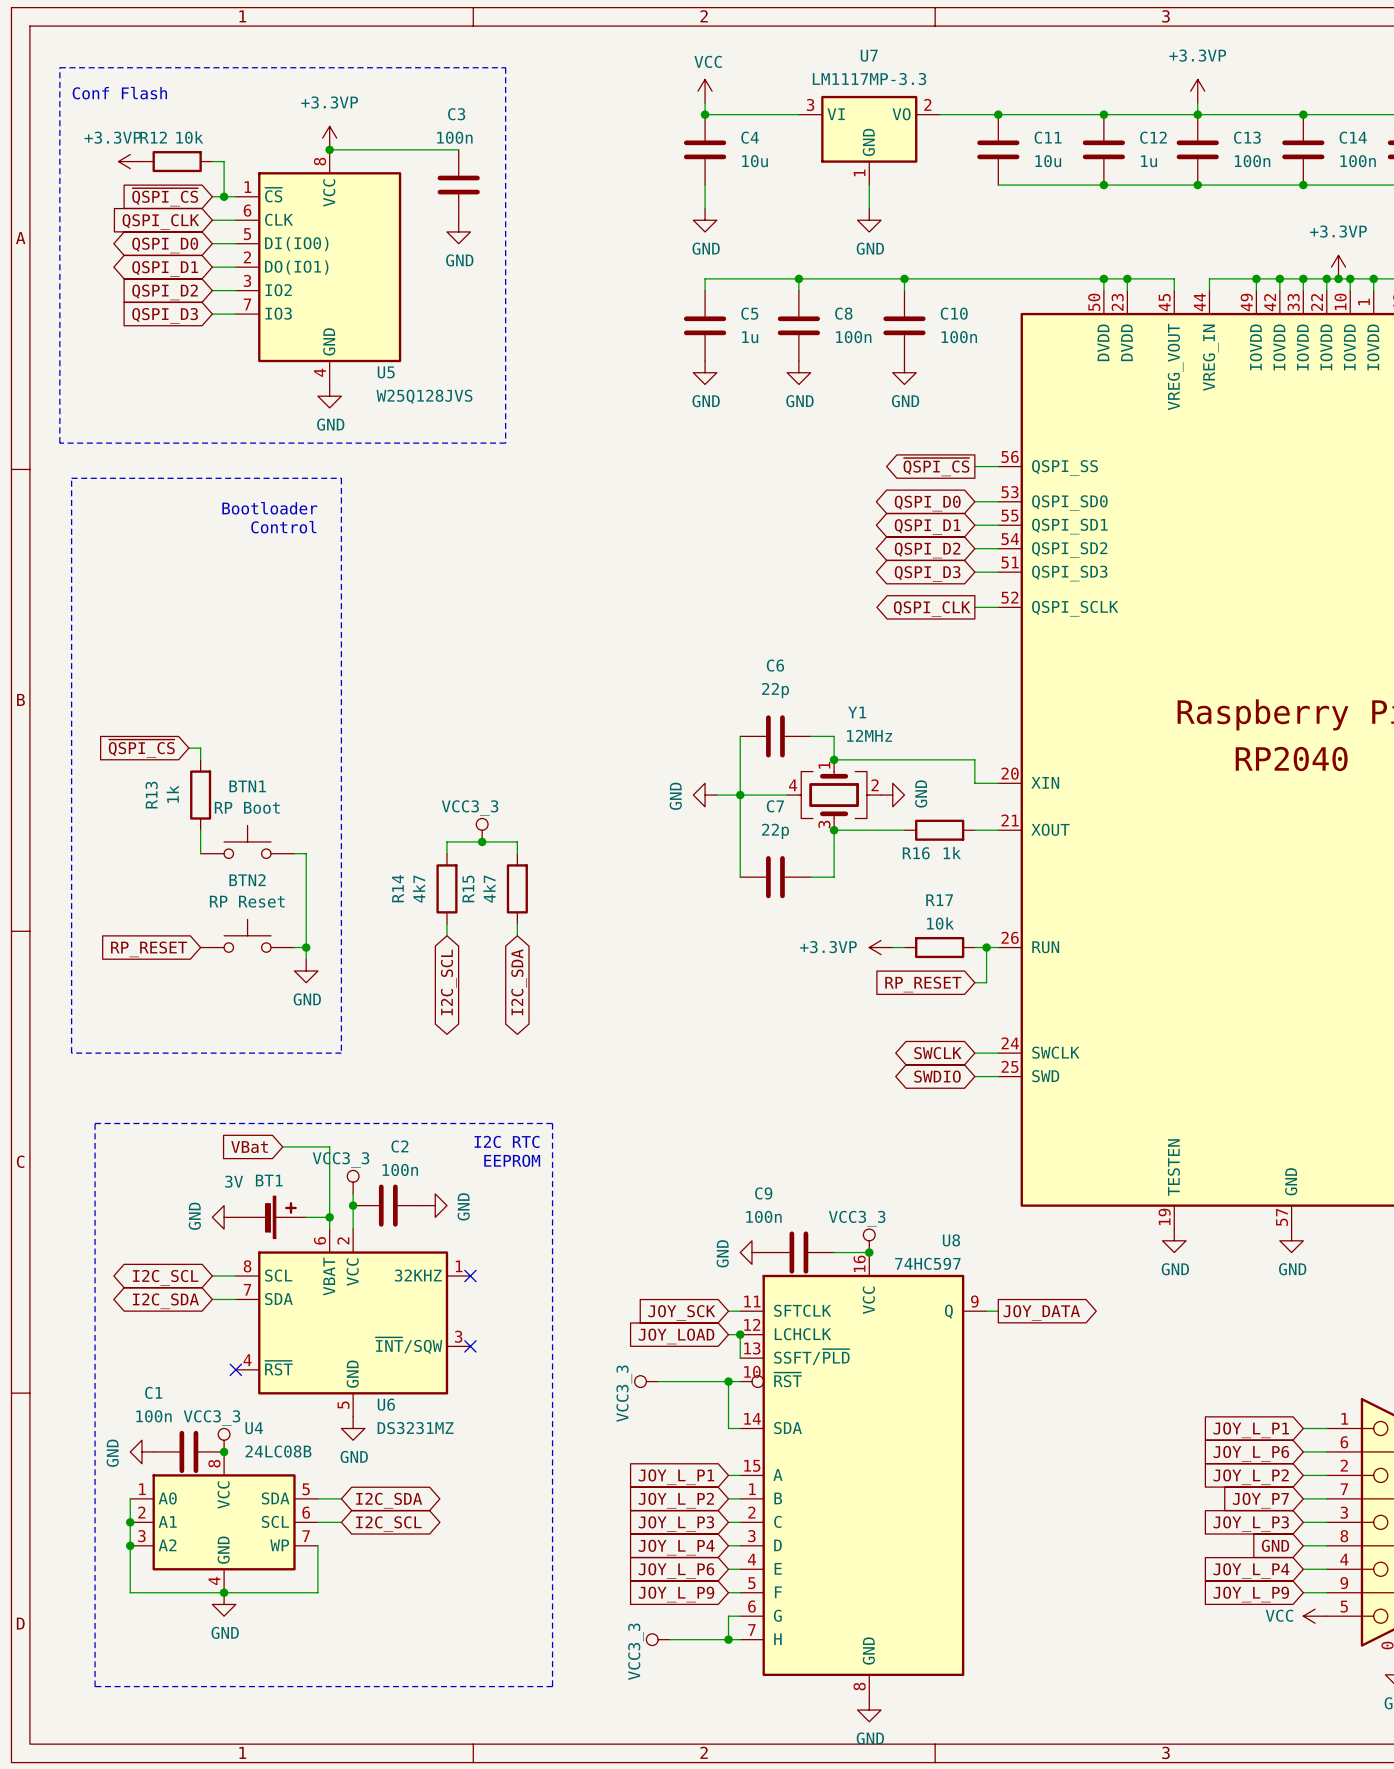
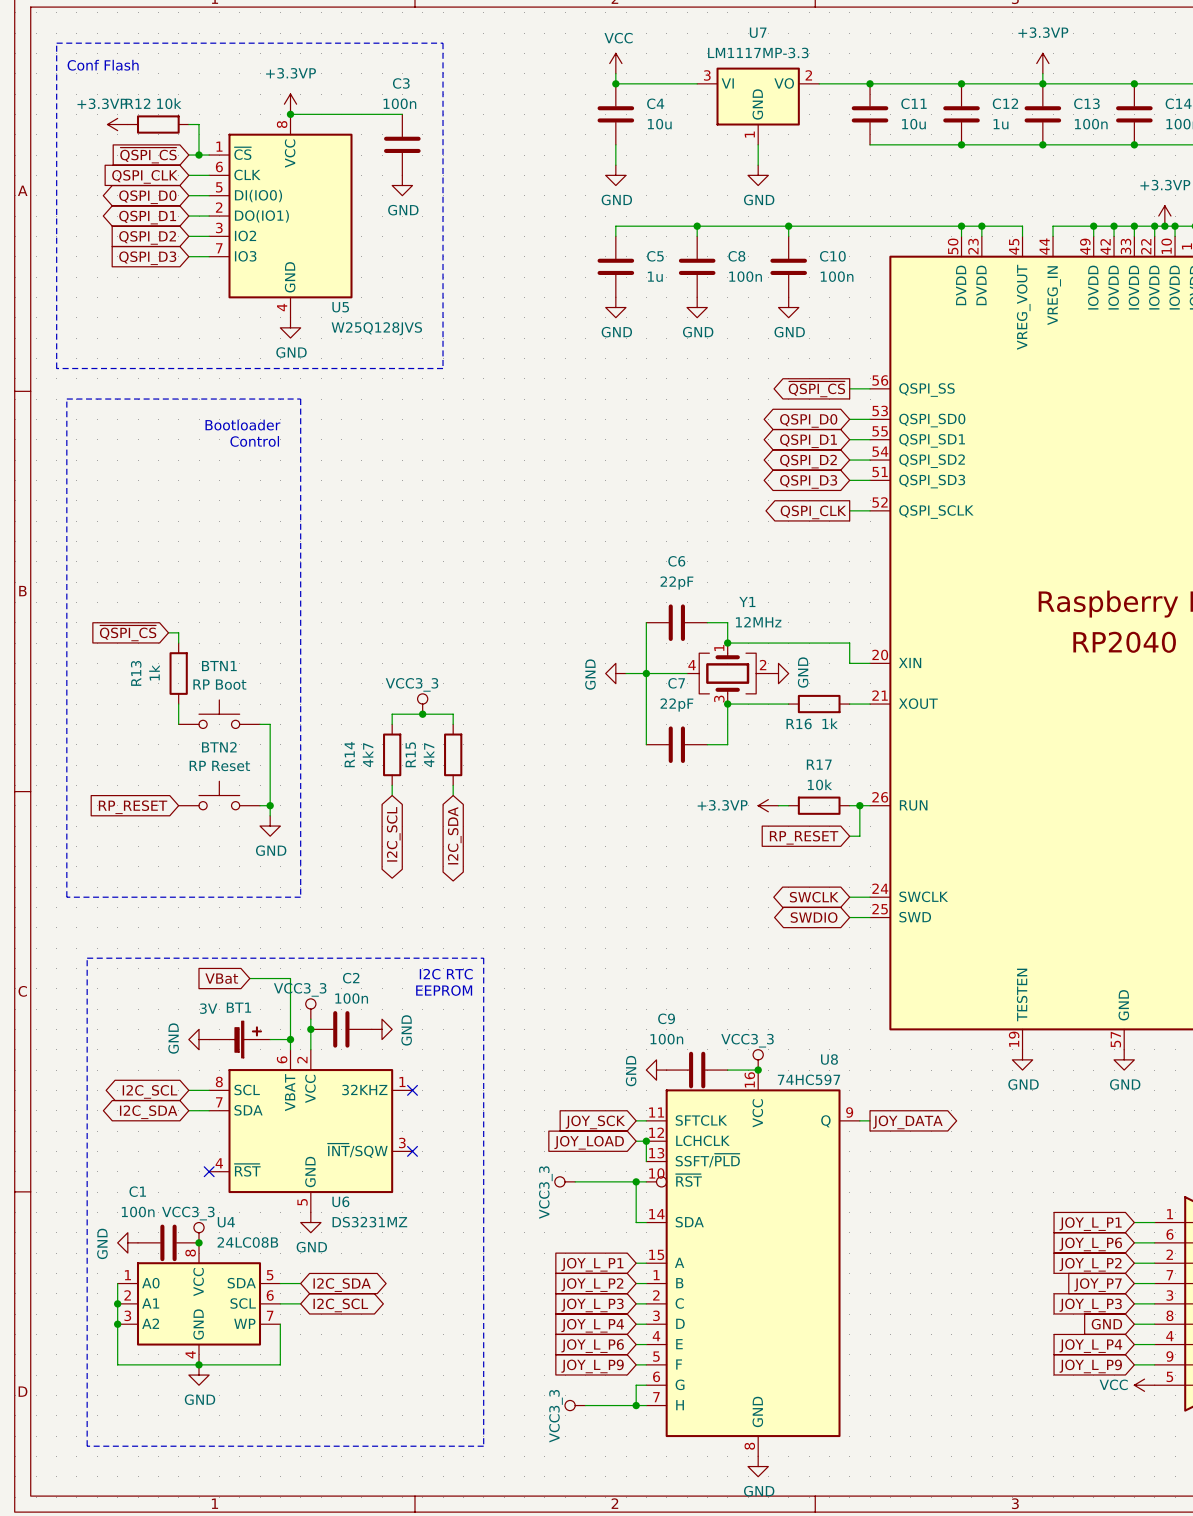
C6 value: 22p (775, 690) -> 22pF (676, 583)
C7 value: 22p (775, 831) -> 22pF (676, 705)

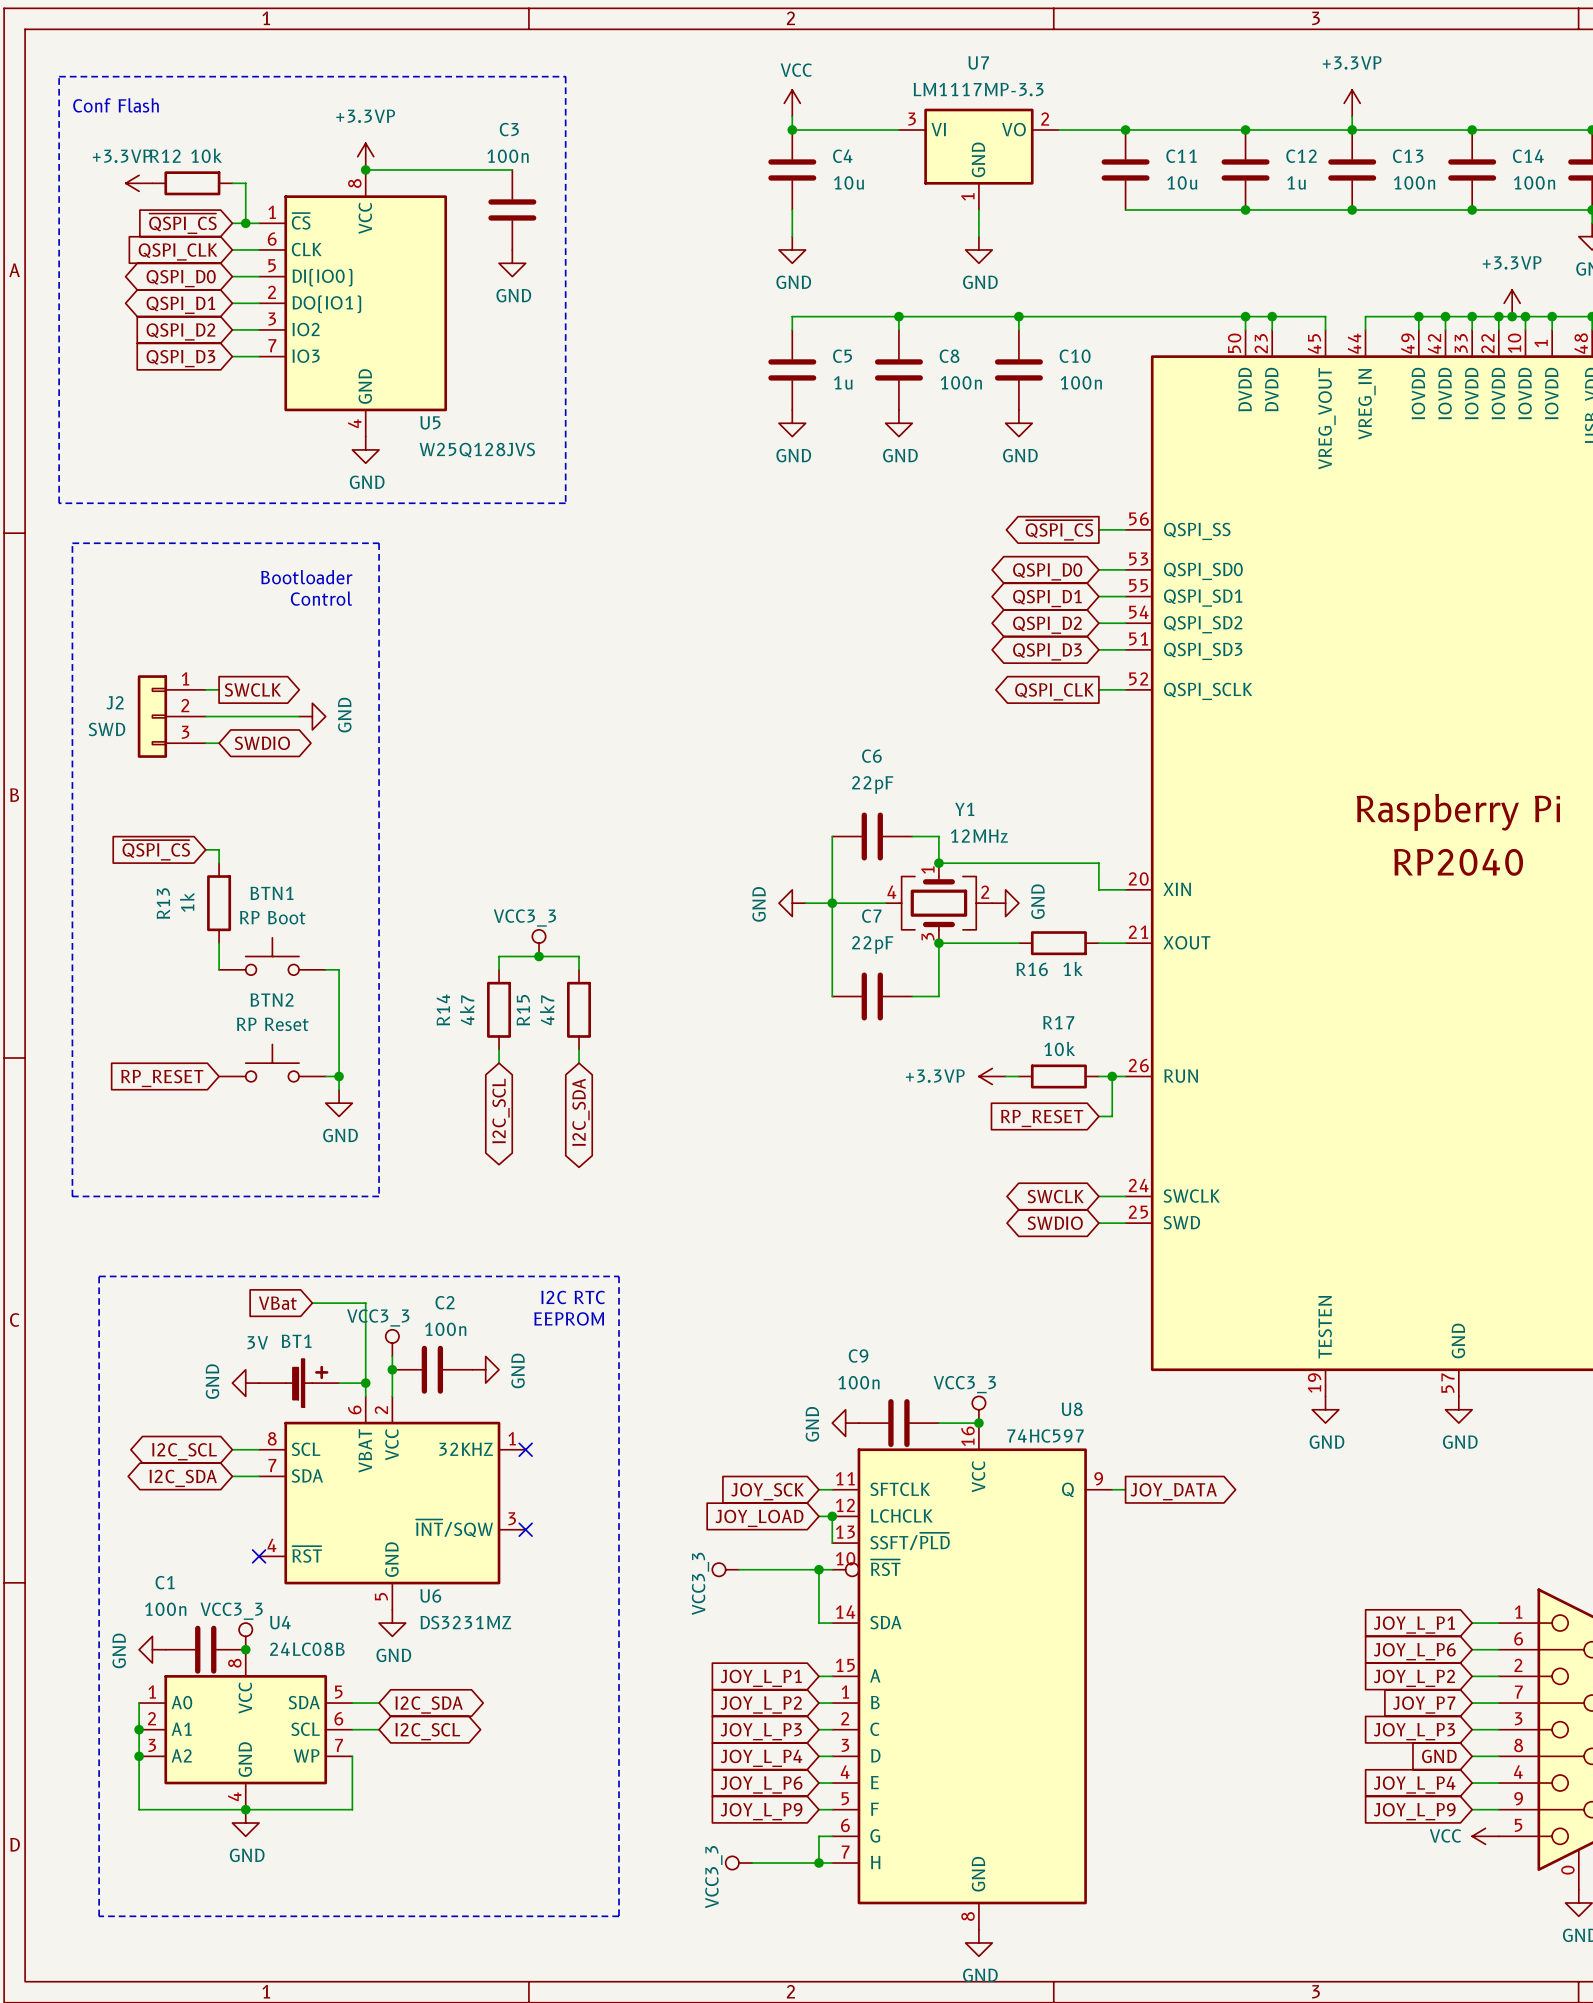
wire: none -> (205, 689) (219, 689)
global label: none -> SWCLK (252, 689)
J2: none -> SWD (171, 716)
wire: none -> (205, 716) (299, 716)
power symbol: none -> GND (312, 716)
wire: none -> (205, 743) (219, 743)
global label: none -> SWDIO (262, 743)

